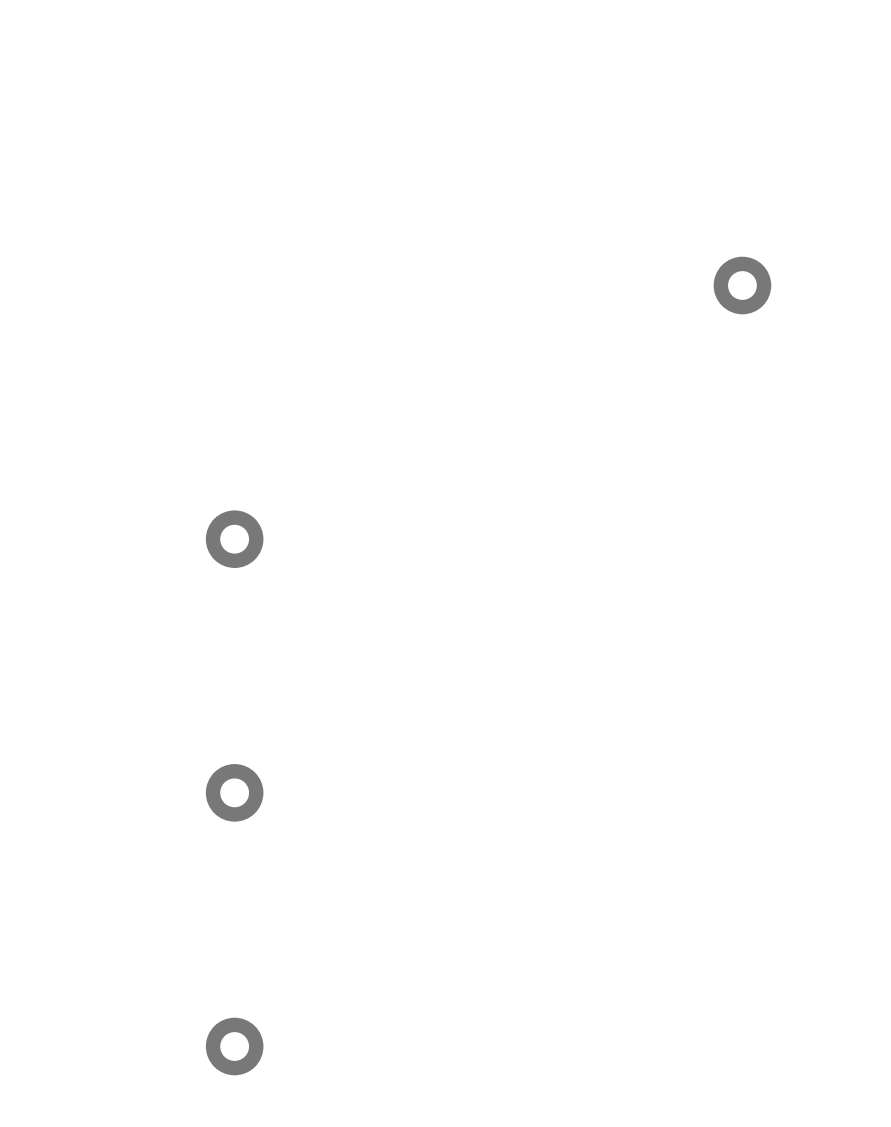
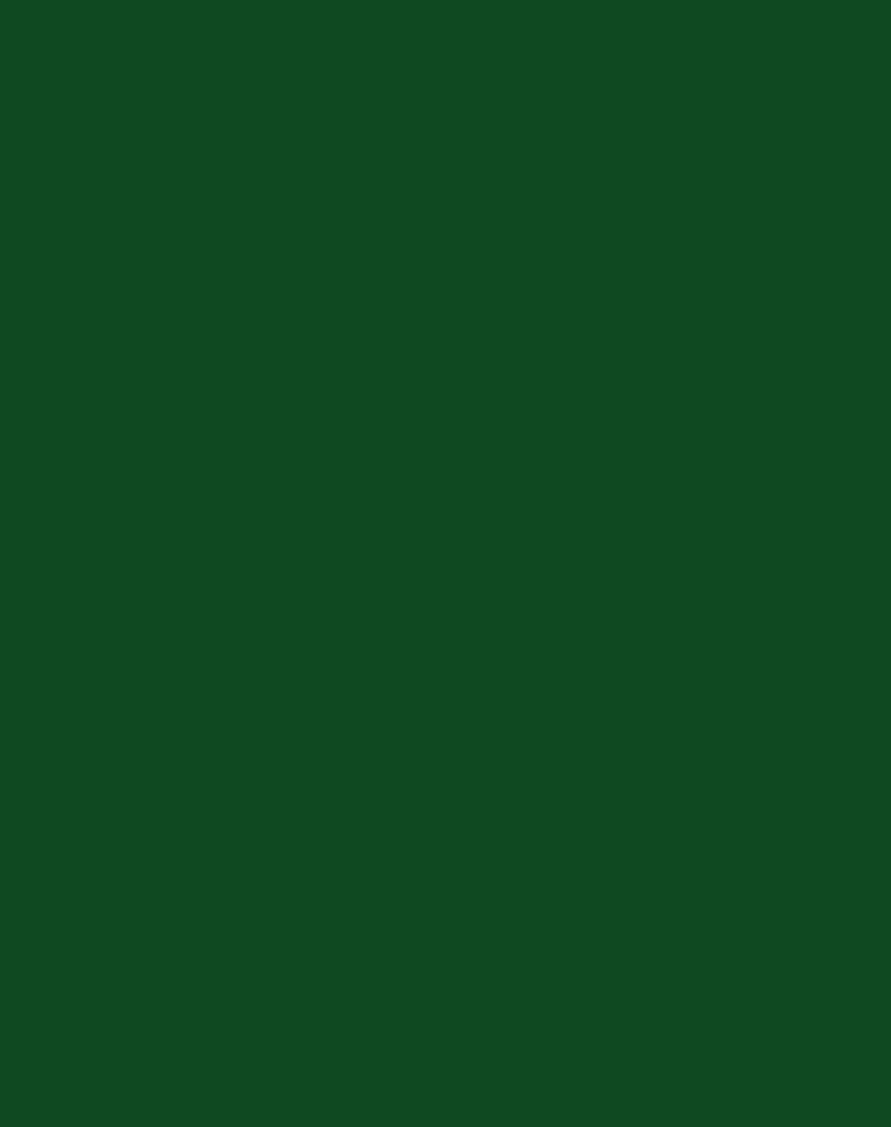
via: (742, 285) -> none
via: (234, 539) -> none
via: (234, 792) -> none
via: (234, 1046) -> none

